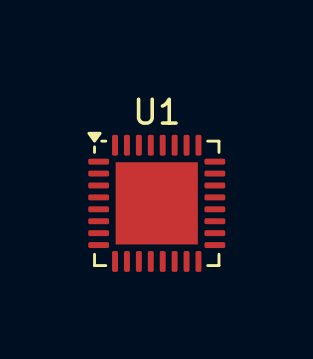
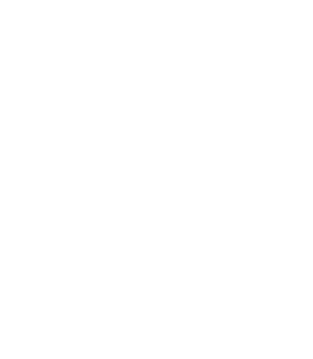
U1: (156, 201) -> none

